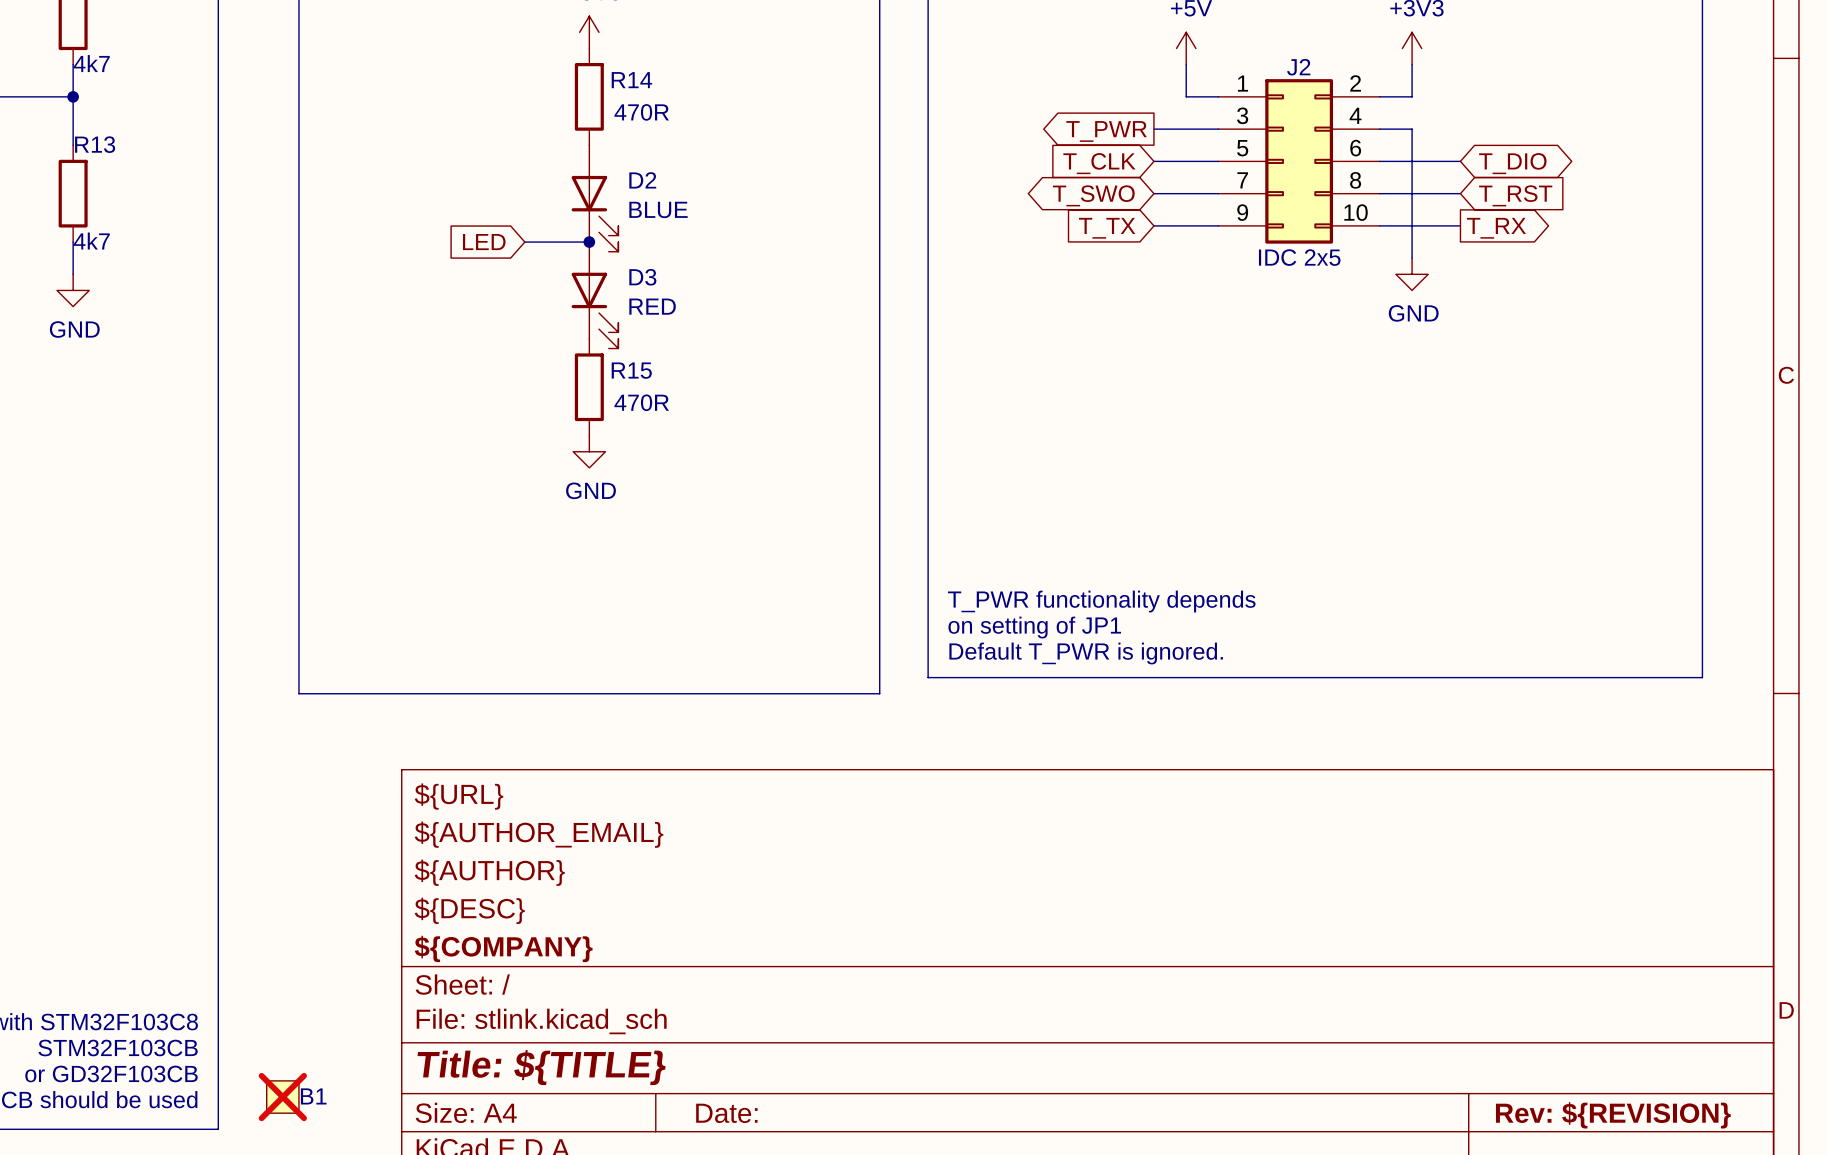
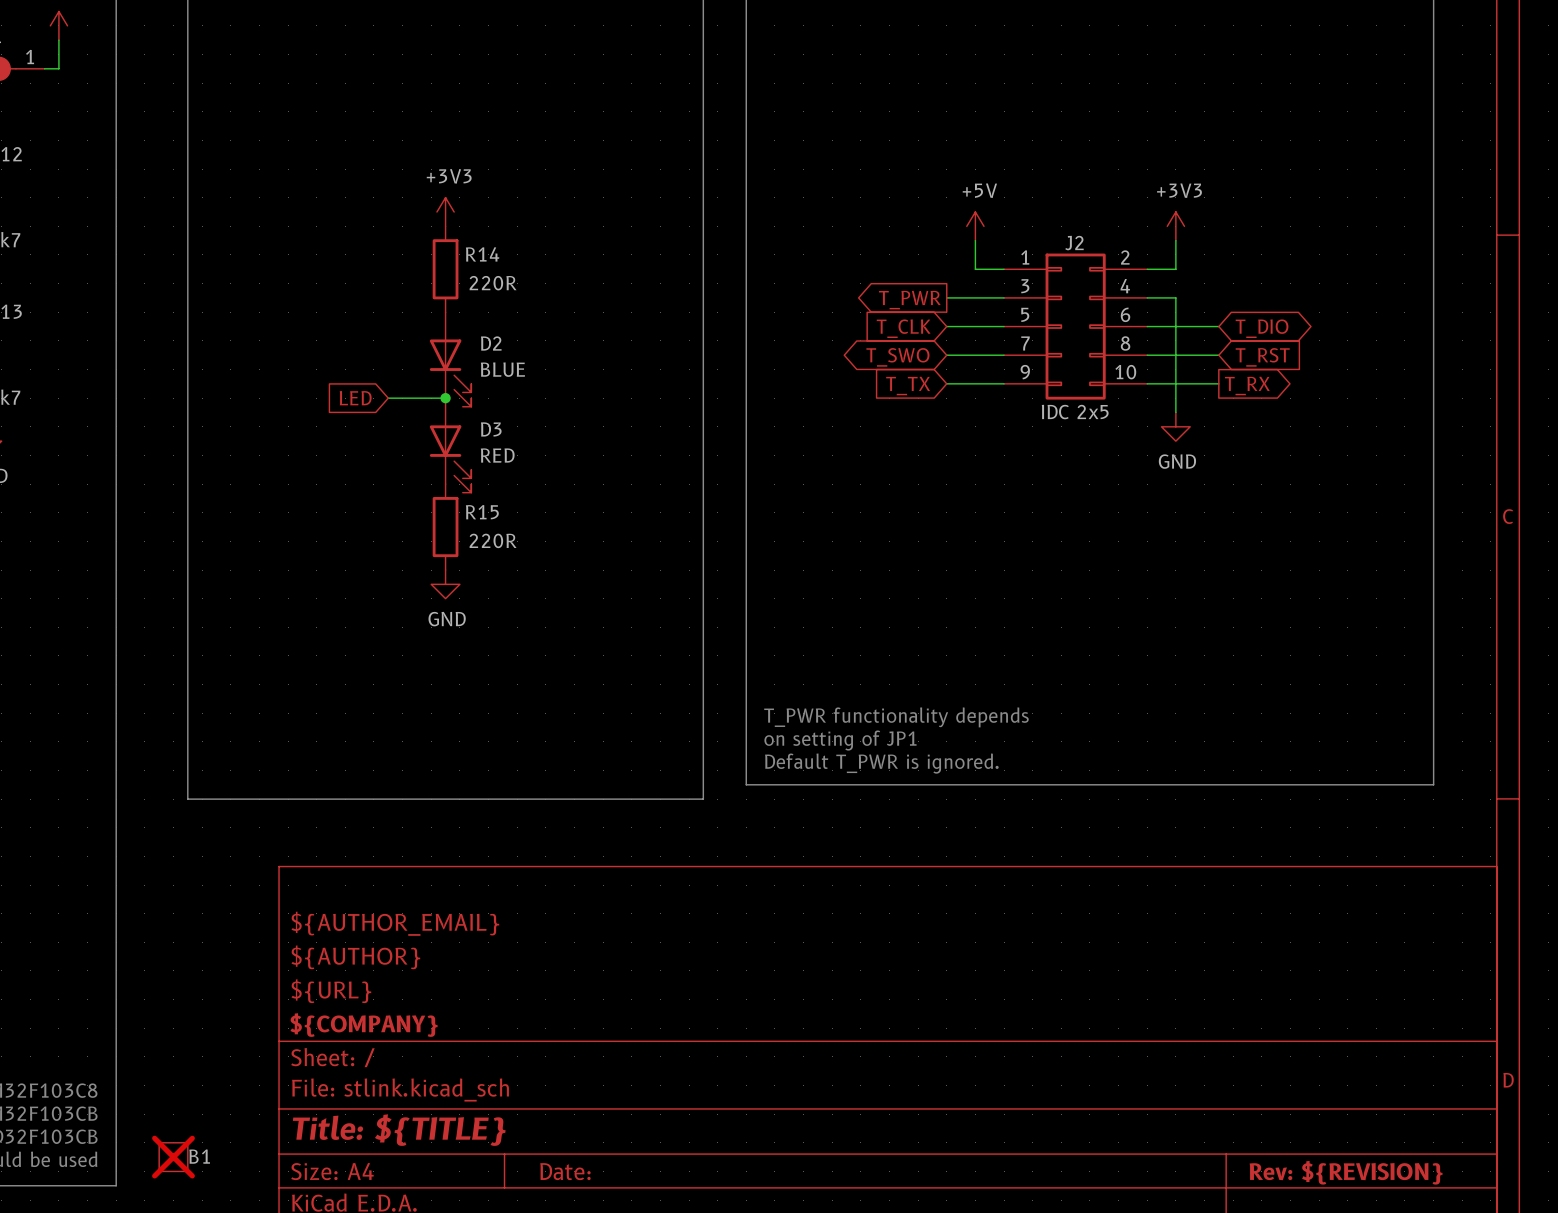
R14 value: 470R (641, 112) -> 220R (493, 283)
R15 value: 470R (641, 402) -> 220R (493, 540)
title block: ${URL} (458, 796) -> none
title block: ${DESC} (469, 910) -> ${URL} (331, 991)

